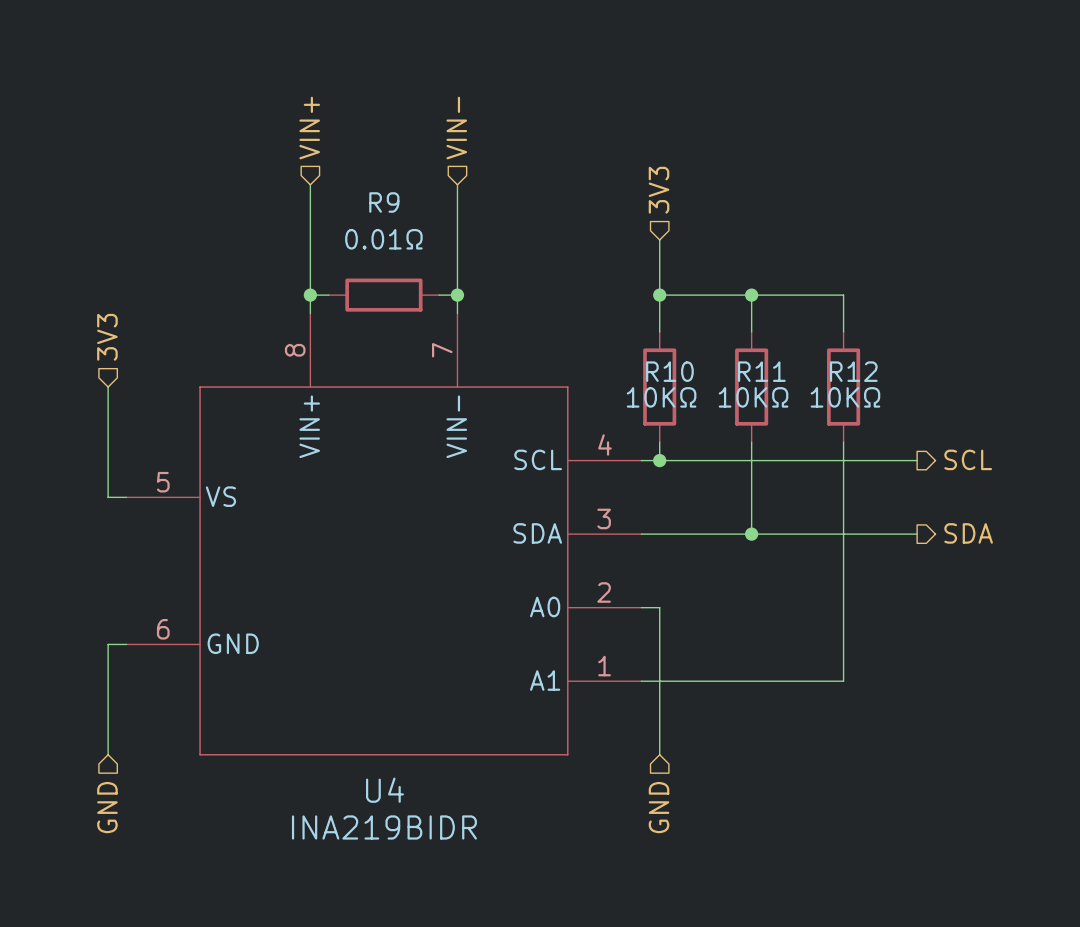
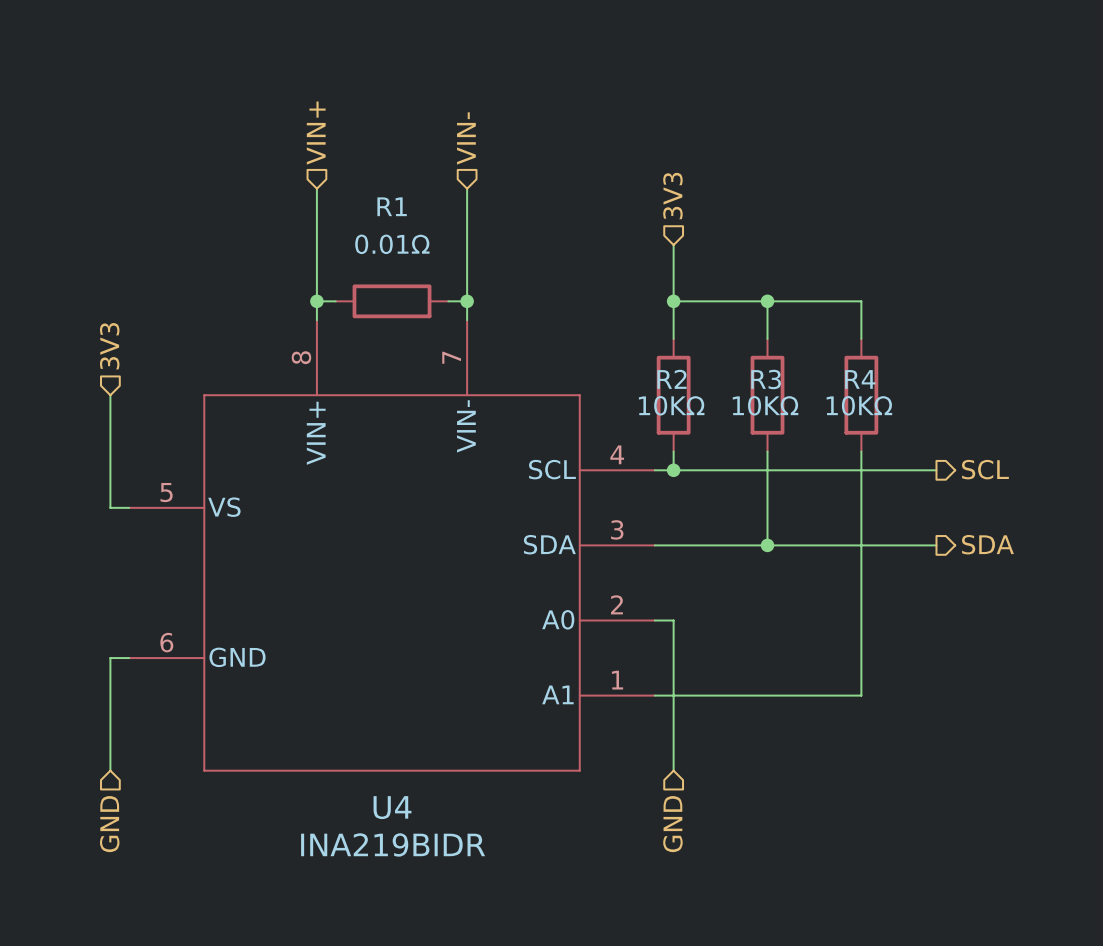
R9 name: R9 (384, 202) -> R1 (392, 206)
R10 name: R10 (669, 371) -> R2 (671, 379)
R11 name: R11 (761, 371) -> R3 (766, 379)
R12 name: R12 (853, 371) -> R4 (860, 379)

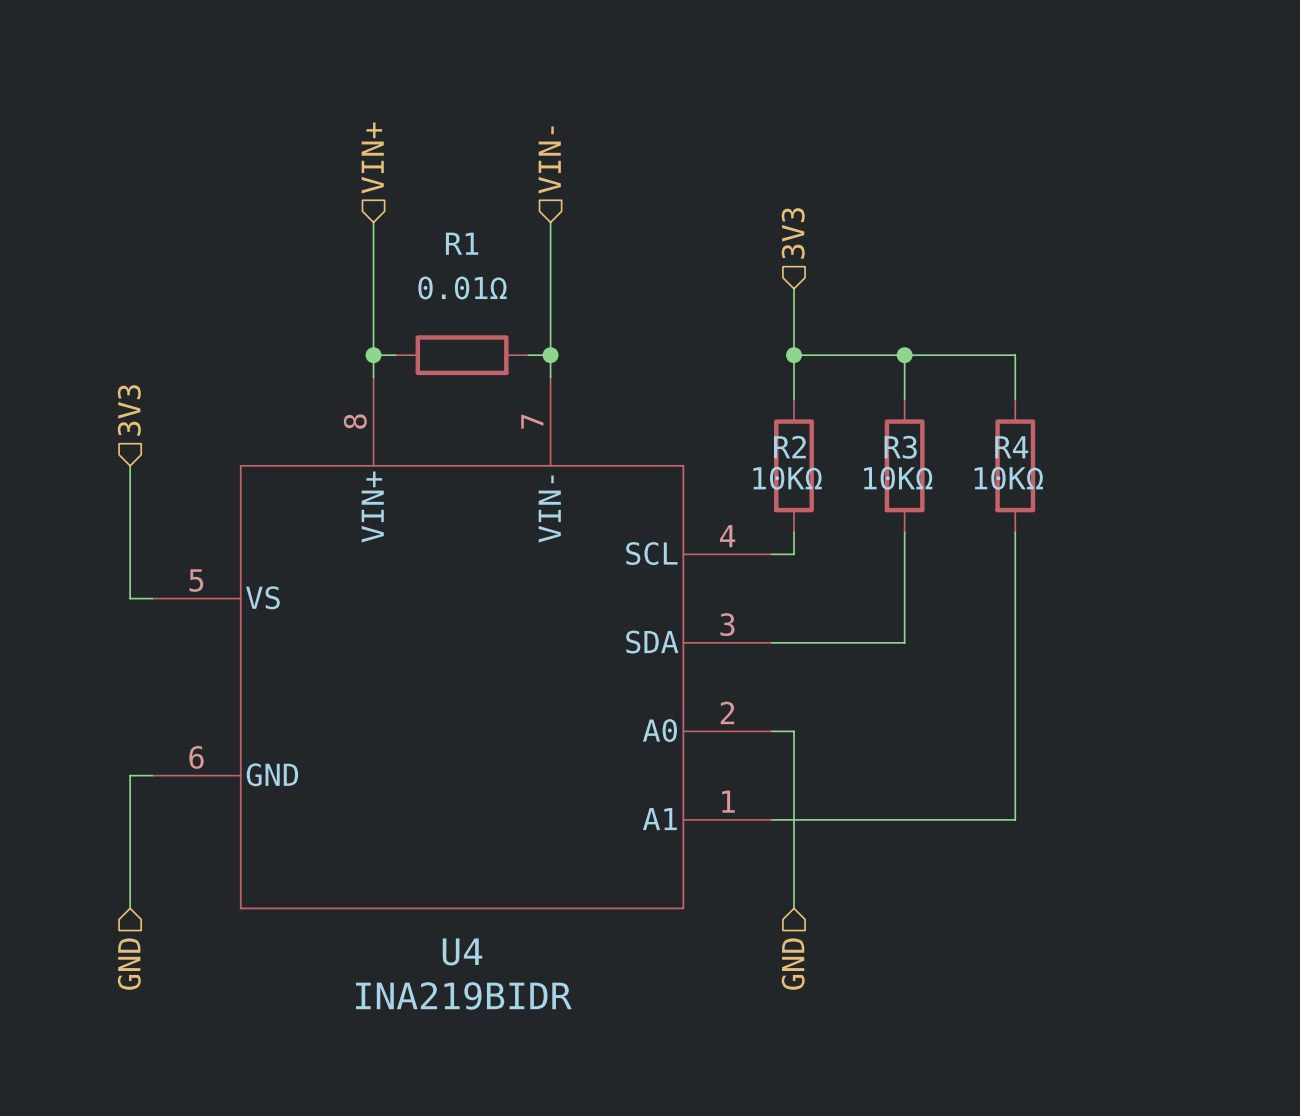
hierarchical label: SCL (985, 469) -> none
wire: (673, 470) (936, 470) -> none
junction: (673, 470) -> none
hierarchical label: SDA (987, 544) -> none
wire: (767, 545) (936, 545) -> none
junction: (767, 545) -> none

